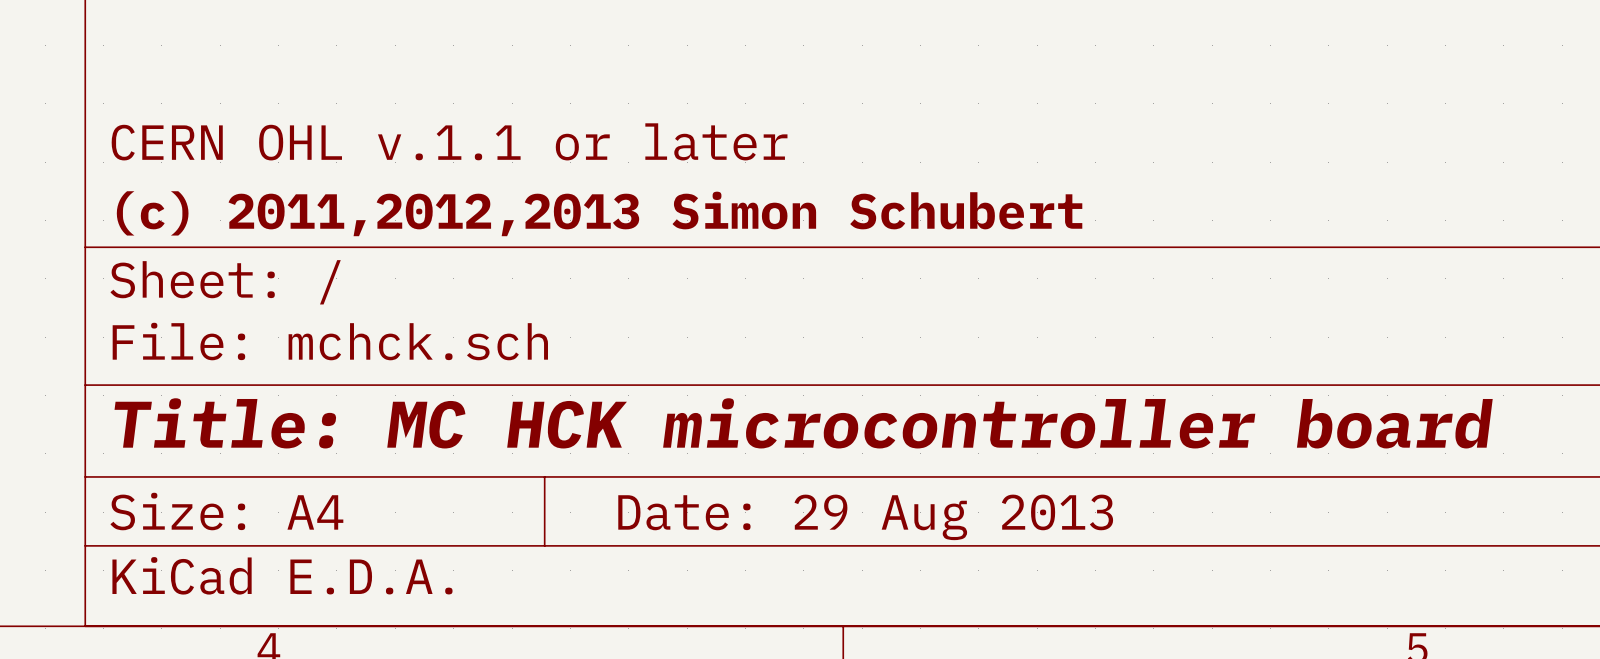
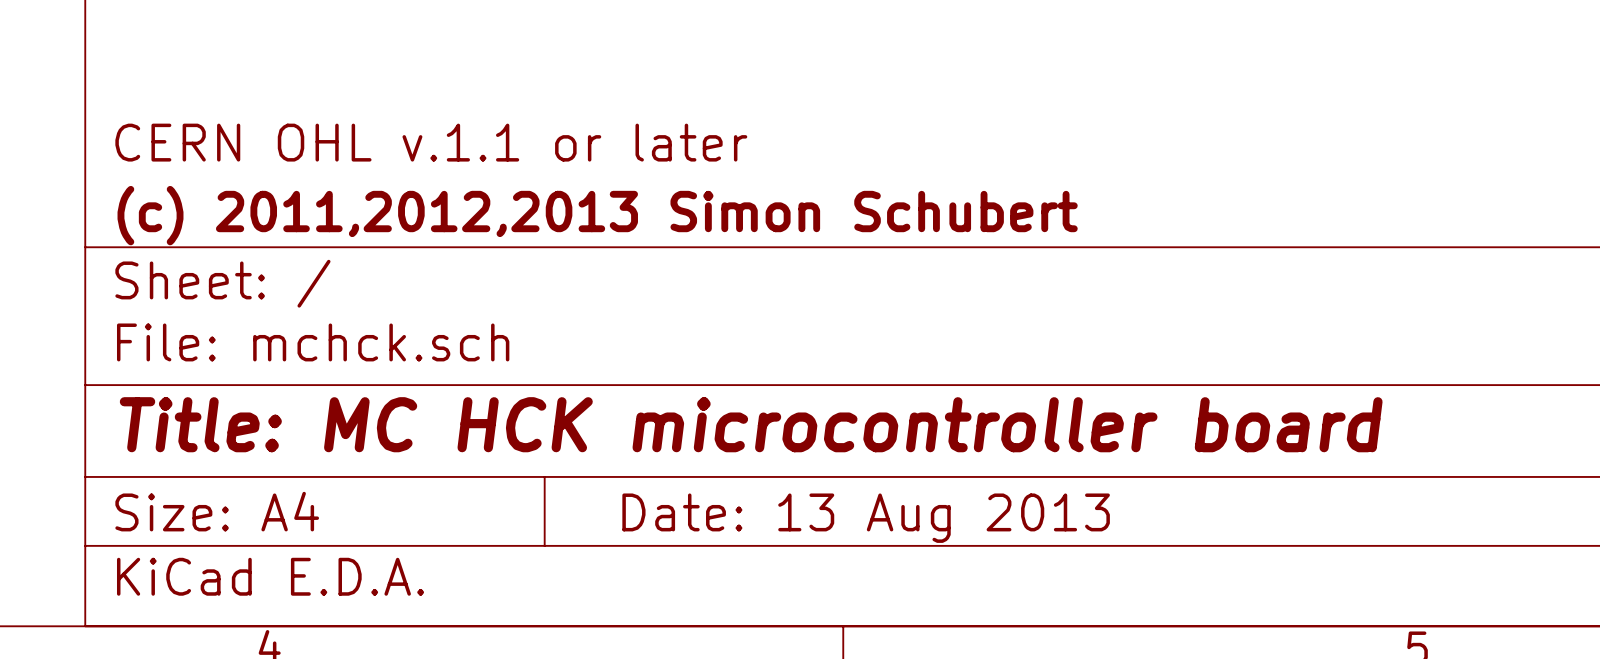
title block: Date: 29 Aug 2013 (865, 517) -> Date: 13 Aug 2013 (866, 518)

